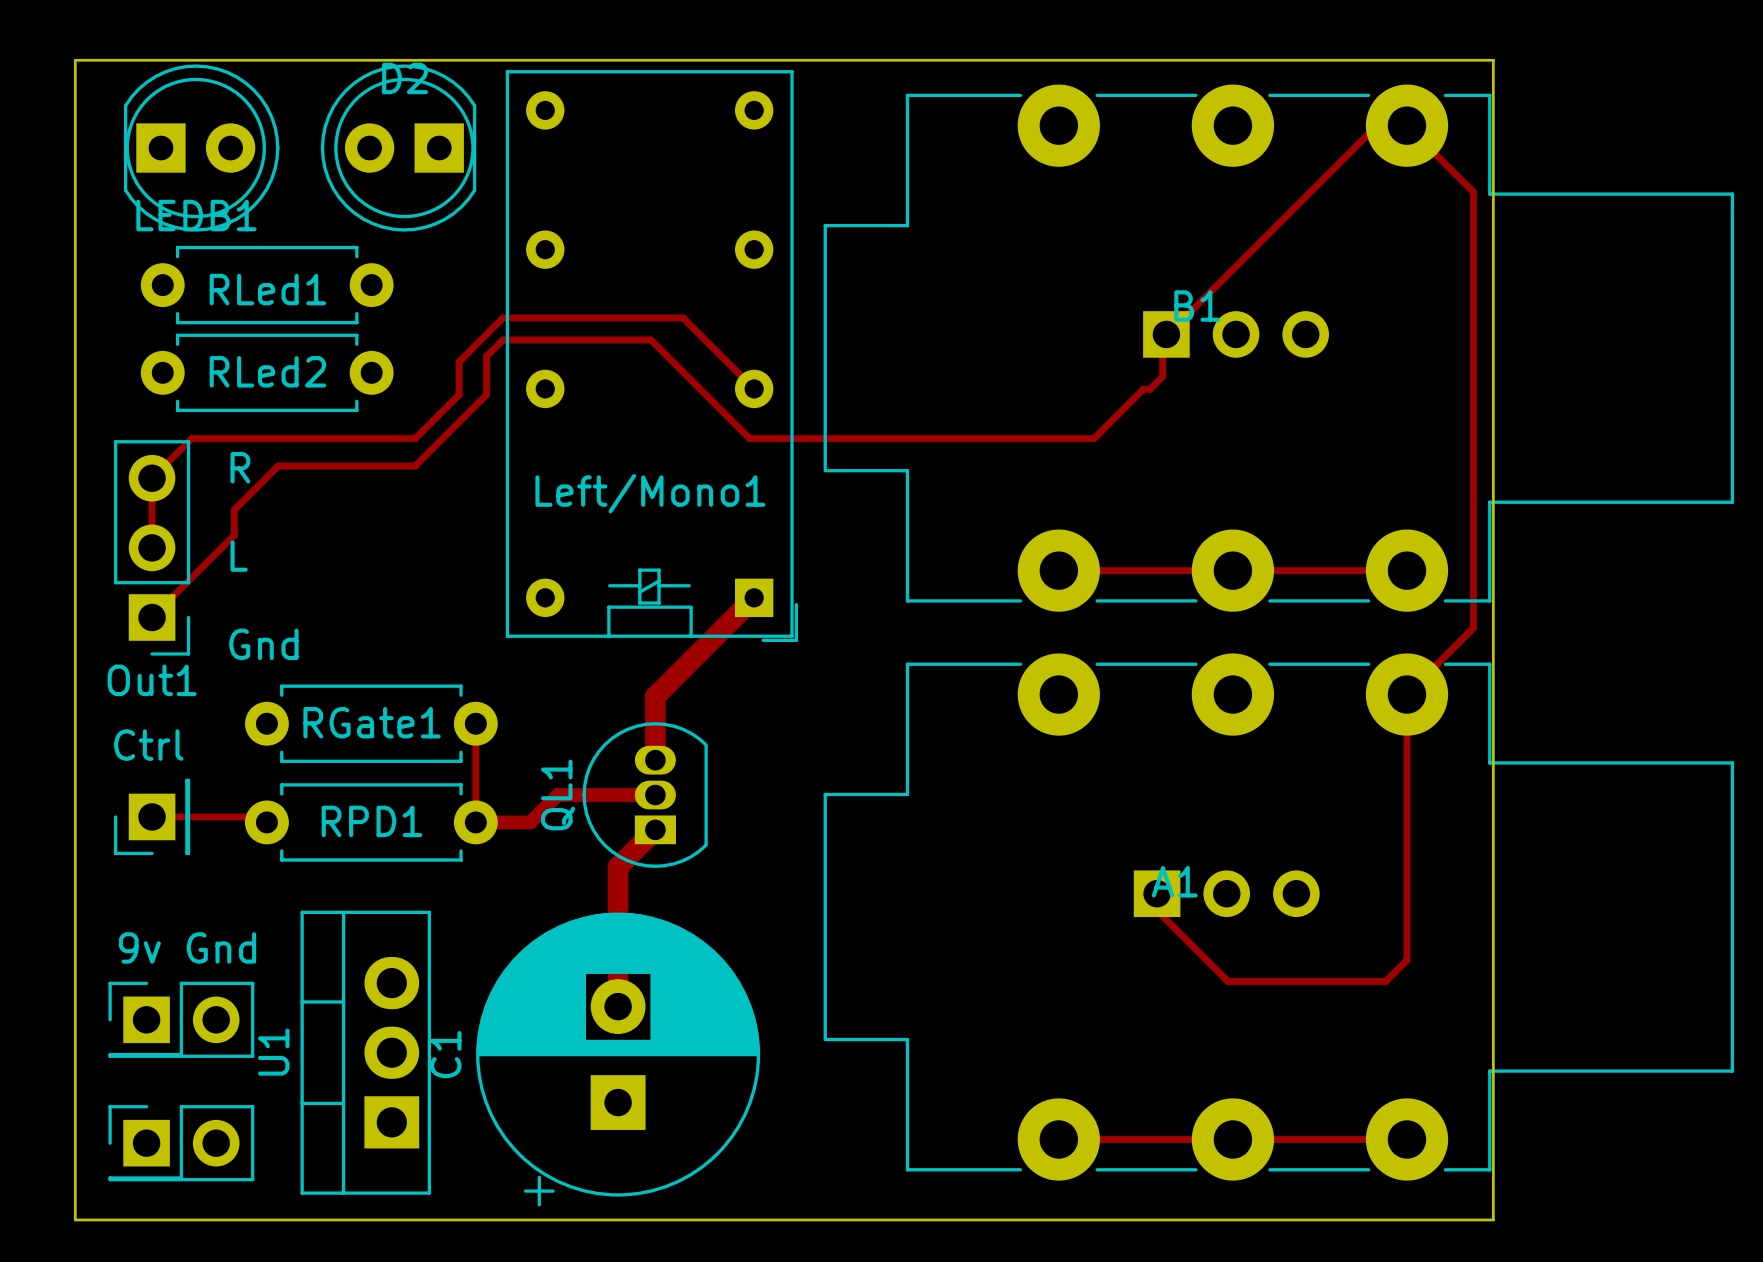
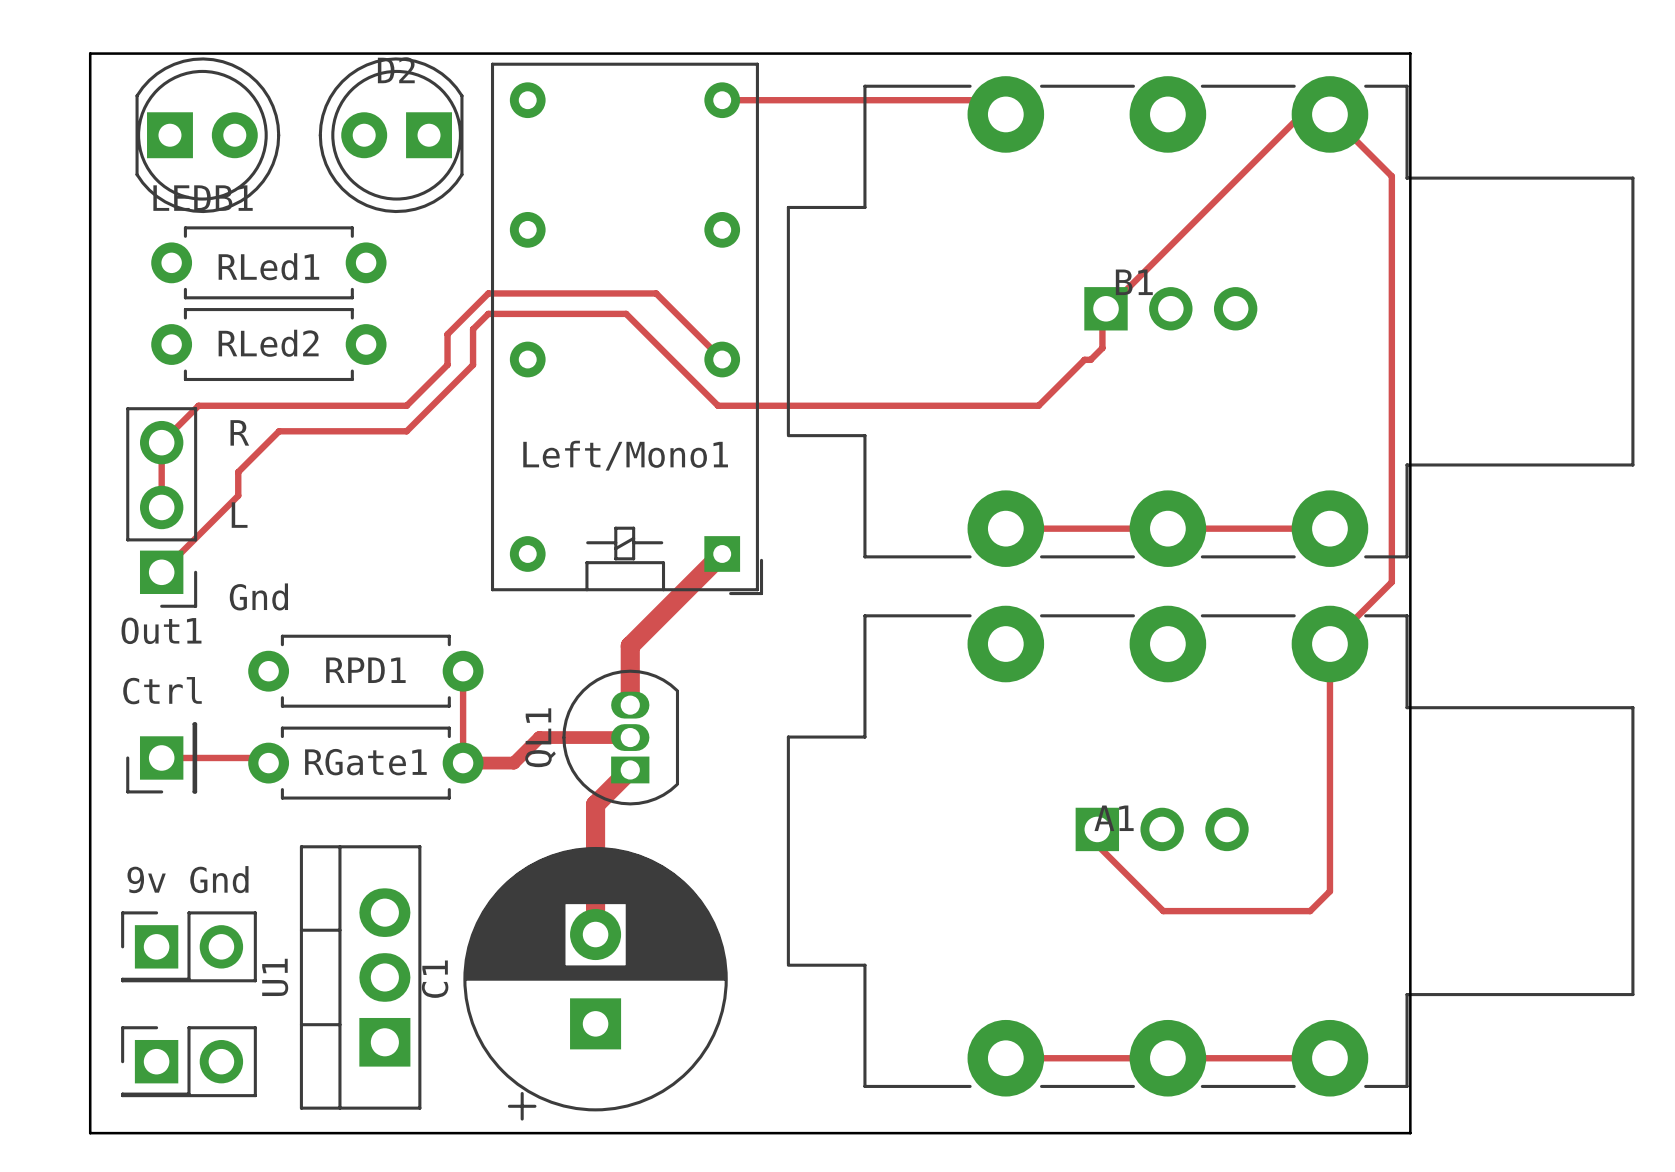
track: none -> (722, 100) (991, 100) (1005, 114)
RGate1 name position: RGate1 (372, 722) -> RGate1 (365, 762)
RPD1 name position: RPD1 (372, 821) -> RPD1 (365, 670)

